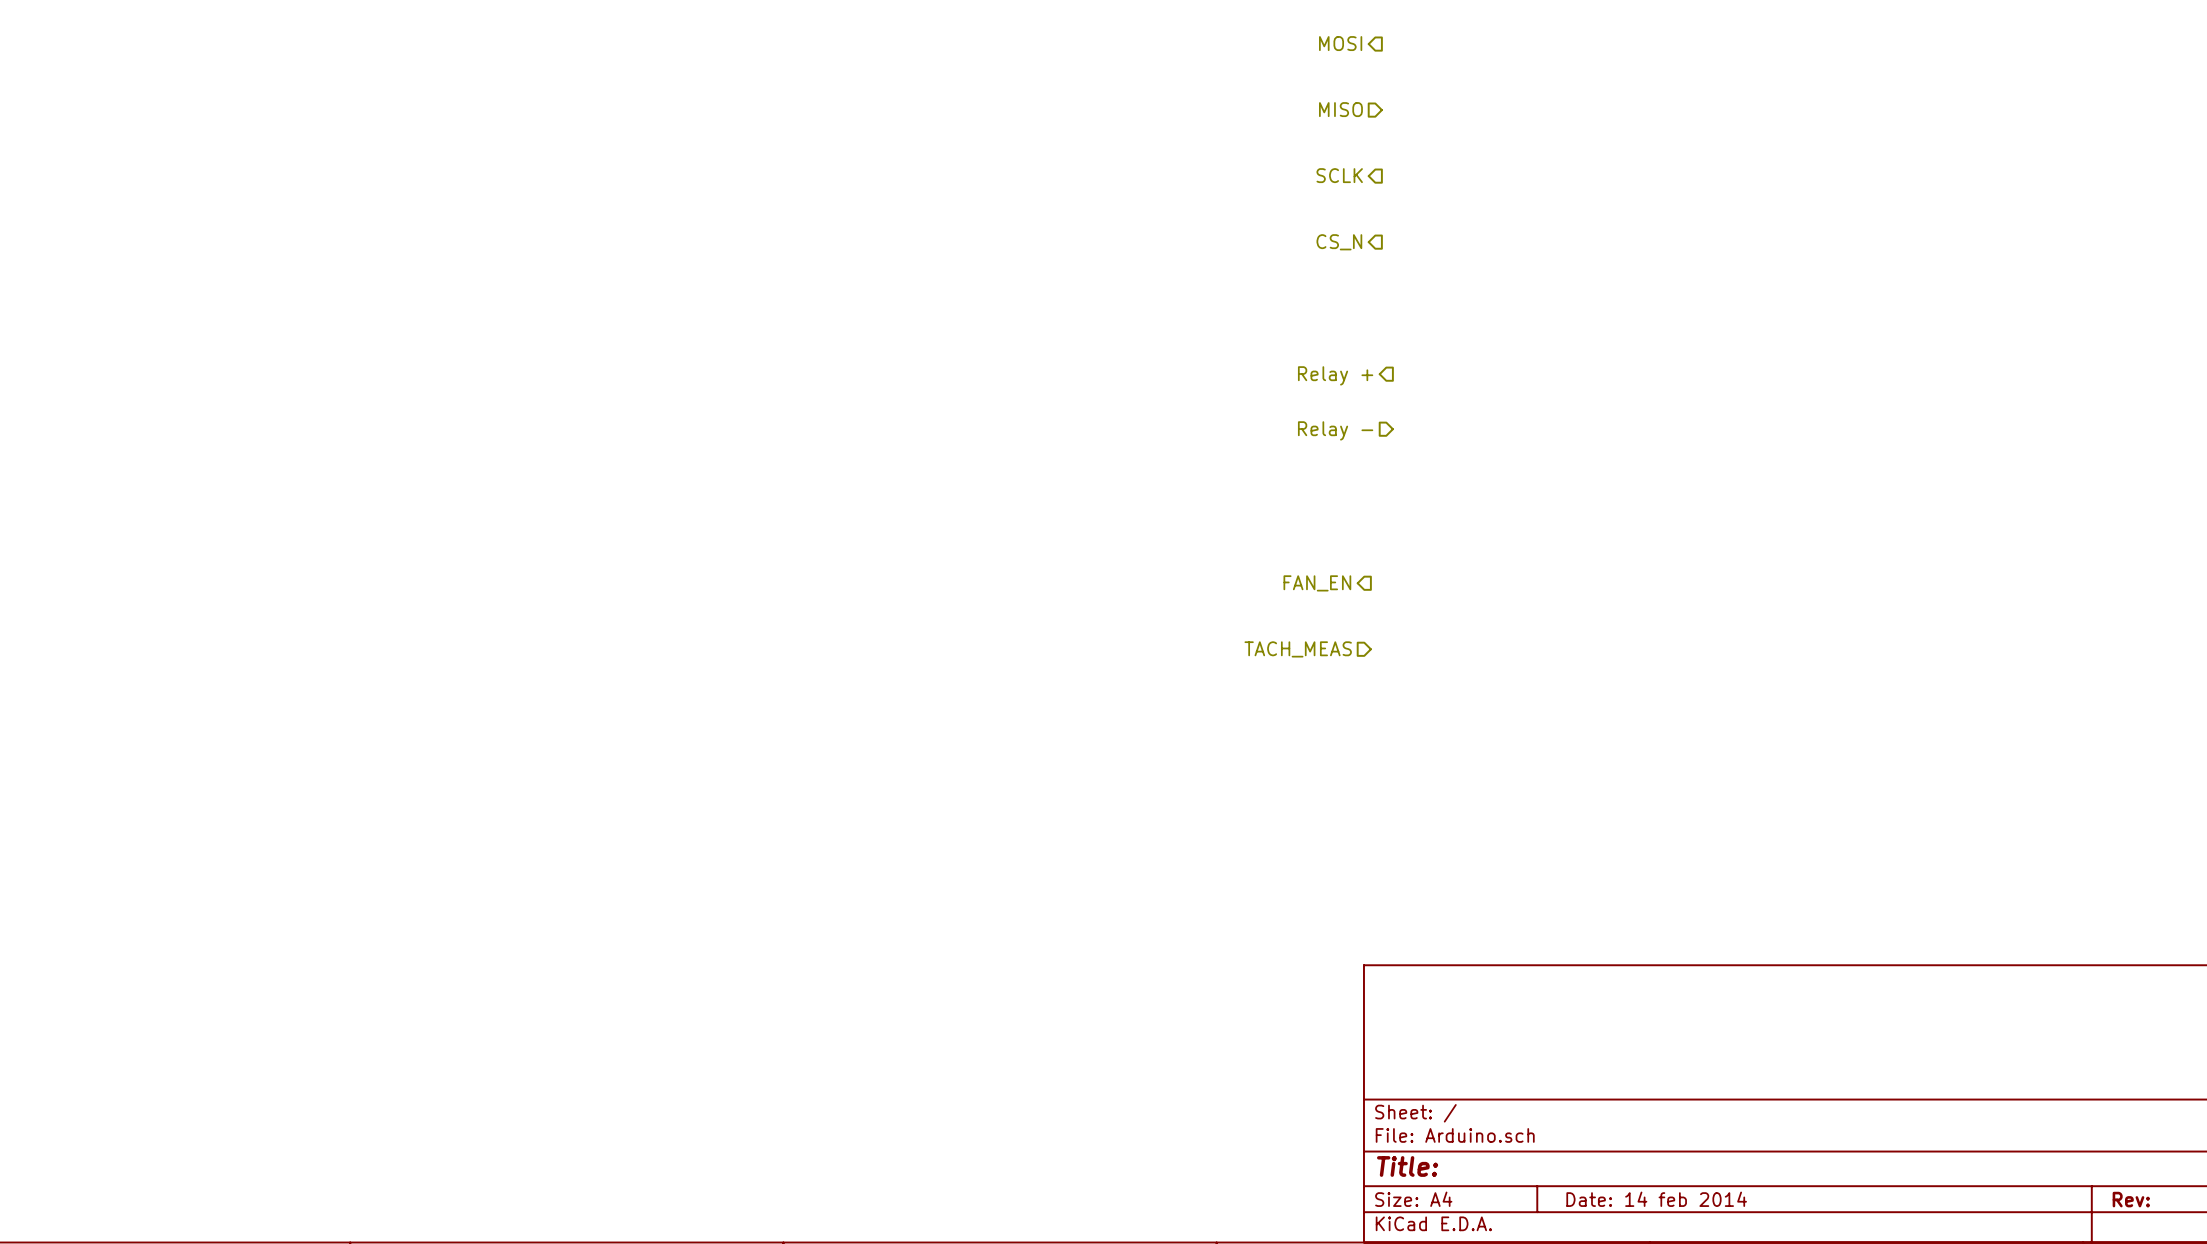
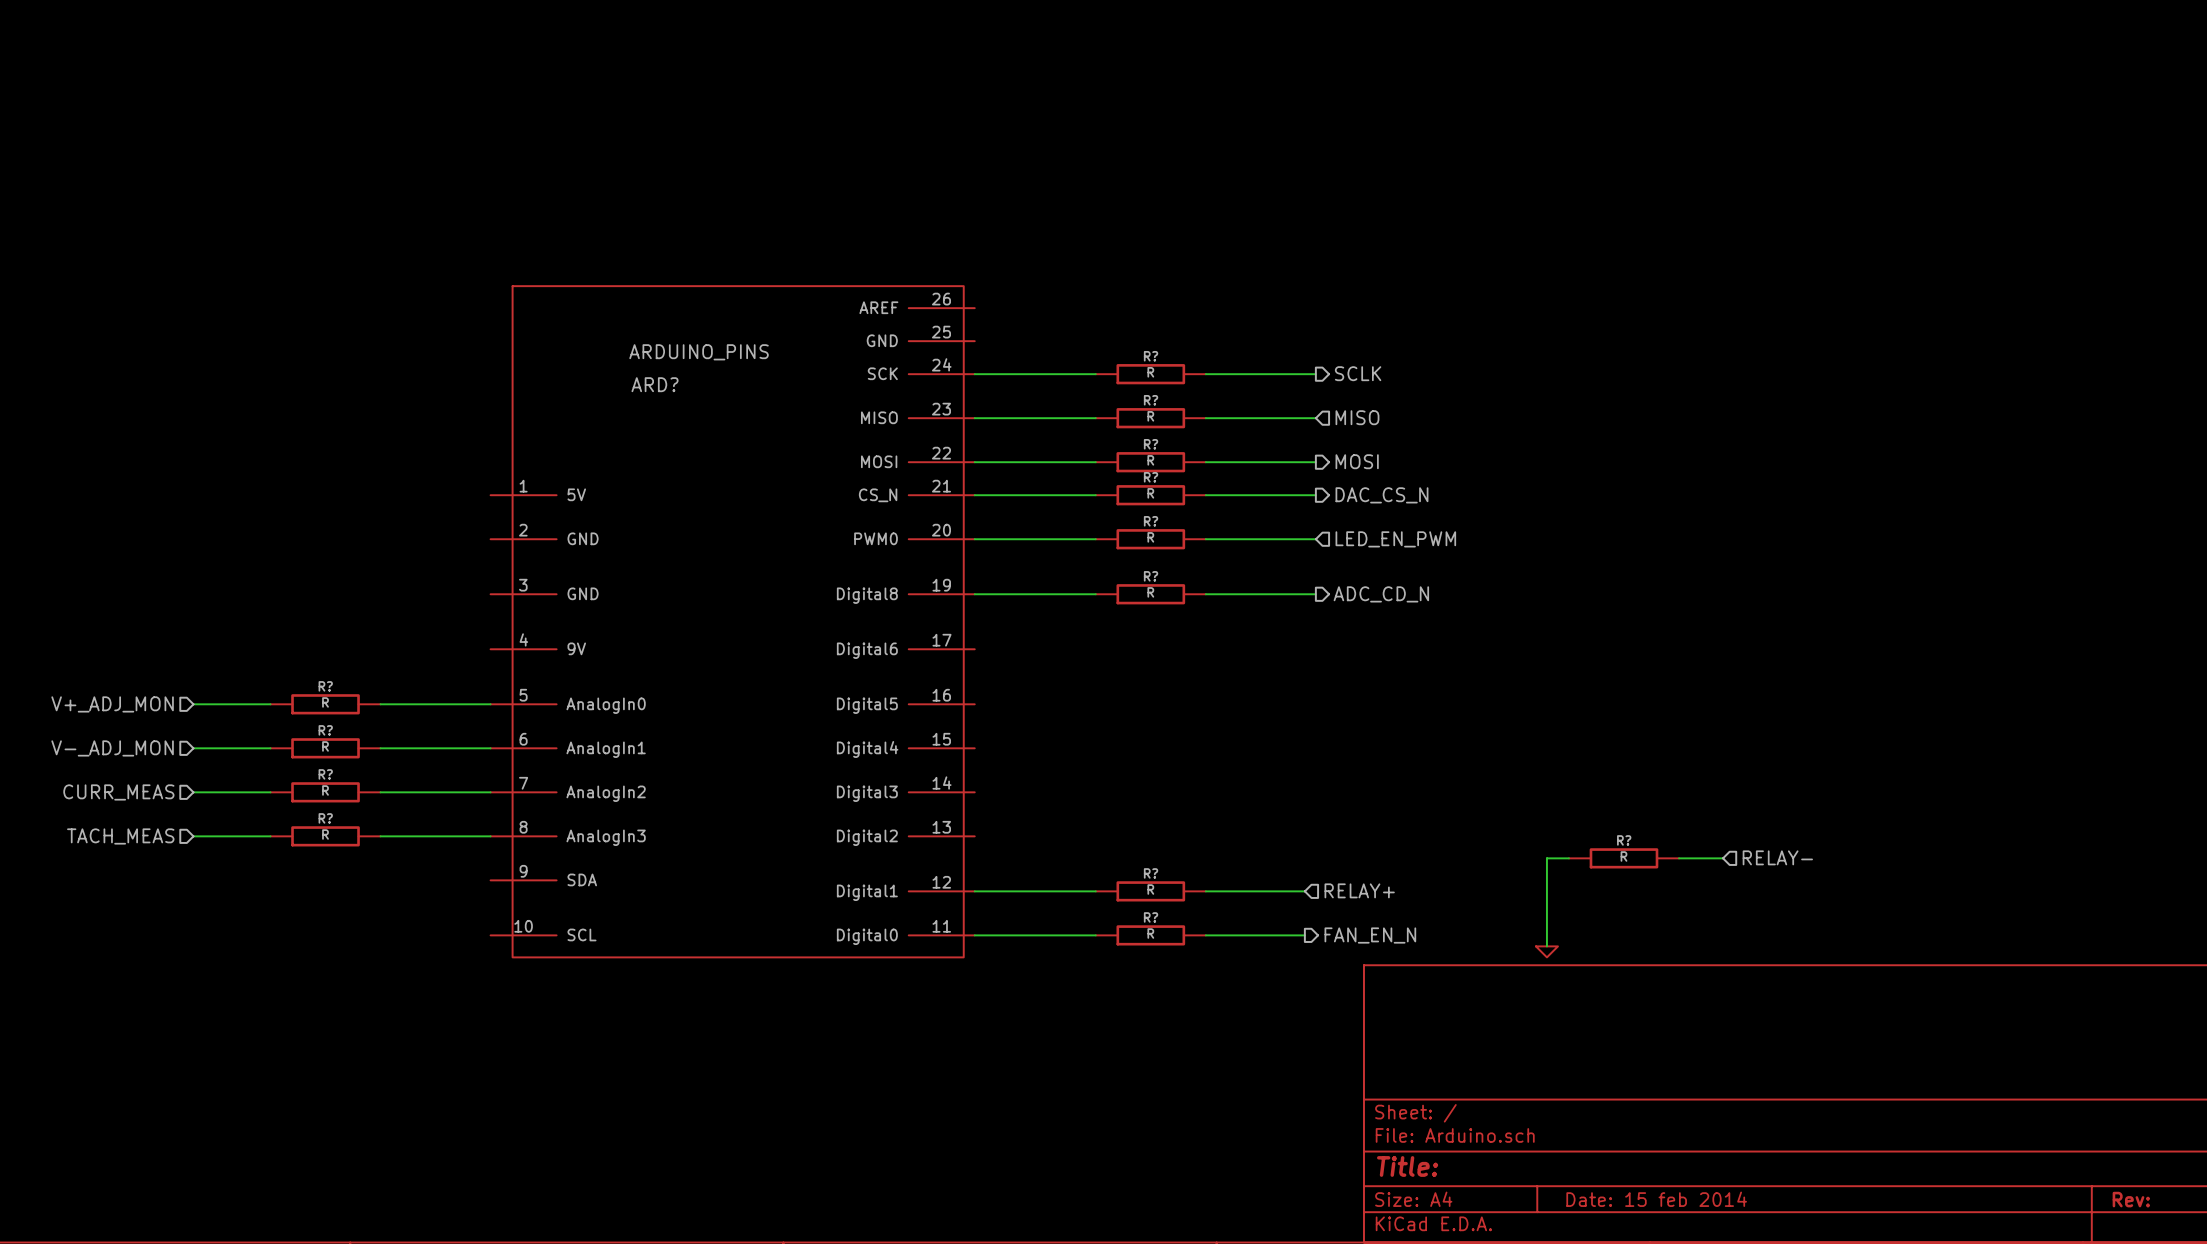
hierarchical label: MOSI (1340, 43) -> none
hierarchical label: MISO (1340, 109) -> none
hierarchical label rotation: 0° (1339, 175) -> 180° (1358, 373)
hierarchical label position: SCLK (1339, 175) -> SCLK (1358, 373)
hierarchical label: CS_N (1339, 242) -> none
wire: none -> (974, 374) (1095, 374)
R?: none -> R (1150, 374)
wire: none -> (1205, 374) (1315, 374)
hierarchical label: Relay + (1335, 375) -> none
hierarchical label: none -> MISO (1357, 417)
wire: none -> (974, 418) (1095, 418)
R?: none -> R (1150, 418)
wire: none -> (1205, 418) (1315, 418)
hierarchical label: Relay - (1335, 430) -> none
hierarchical label: none -> MOSI (1357, 461)
wire: none -> (974, 462) (1095, 462)
R?: none -> R (1150, 462)
wire: none -> (1205, 462) (1315, 462)
wire: none -> (974, 495) (1095, 495)
R?: none -> R (1150, 495)
wire: none -> (1205, 495) (1315, 495)
hierarchical label: none -> DAC_CS_N (1381, 495)
wire: none -> (974, 539) (1095, 539)
R?: none -> R (1150, 539)
wire: none -> (1205, 539) (1315, 539)
hierarchical label: none -> LED_EN_PWM (1395, 539)
hierarchical label: FAN_EN (1317, 583) -> none
wire: none -> (974, 594) (1095, 594)
R?: none -> R (1150, 594)
wire: none -> (1205, 594) (1315, 594)
hierarchical label: none -> ADC_CD_N (1381, 594)
ARD?: none -> ARDUINO_PINS (732, 621)
hierarchical label: TACH_MEAS (1298, 649) -> none
hierarchical label: none -> V+_ADJ_MON (112, 704)
wire: none -> (193, 704) (270, 704)
R?: none -> R (325, 704)
wire: none -> (380, 704) (490, 704)
hierarchical label: none -> V-_ADJ_MON (112, 748)
wire: none -> (193, 748) (270, 748)
R?: none -> R (325, 748)
wire: none -> (380, 748) (490, 748)
hierarchical label: none -> CURR_MEAS (118, 792)
wire: none -> (193, 792) (270, 792)
R?: none -> R (325, 792)
wire: none -> (380, 792) (490, 792)
hierarchical label: none -> TACH_MEAS (120, 836)
wire: none -> (193, 836) (270, 836)
R?: none -> R (325, 836)
wire: none -> (380, 836) (490, 836)
hierarchical label: none -> RELAY- (1777, 857)
wire: none -> (1568, 858) (1546, 858) (1546, 946)
R?: none -> R (1623, 858)
wire: none -> (1679, 858) (1723, 858)
hierarchical label: none -> RELAY+ (1359, 890)
wire: none -> (974, 891) (1095, 891)
R?: none -> R (1150, 891)
wire: none -> (1205, 891) (1304, 891)
wire: none -> (974, 935) (1095, 935)
R?: none -> R (1150, 935)
wire: none -> (1205, 935) (1304, 935)
hierarchical label: none -> FAN_EN_N (1370, 935)
power symbol: none -> (1546, 951)
title block: Date: 14 feb 2014 (1656, 1199) -> Date: 15 feb 2014 (1656, 1199)

